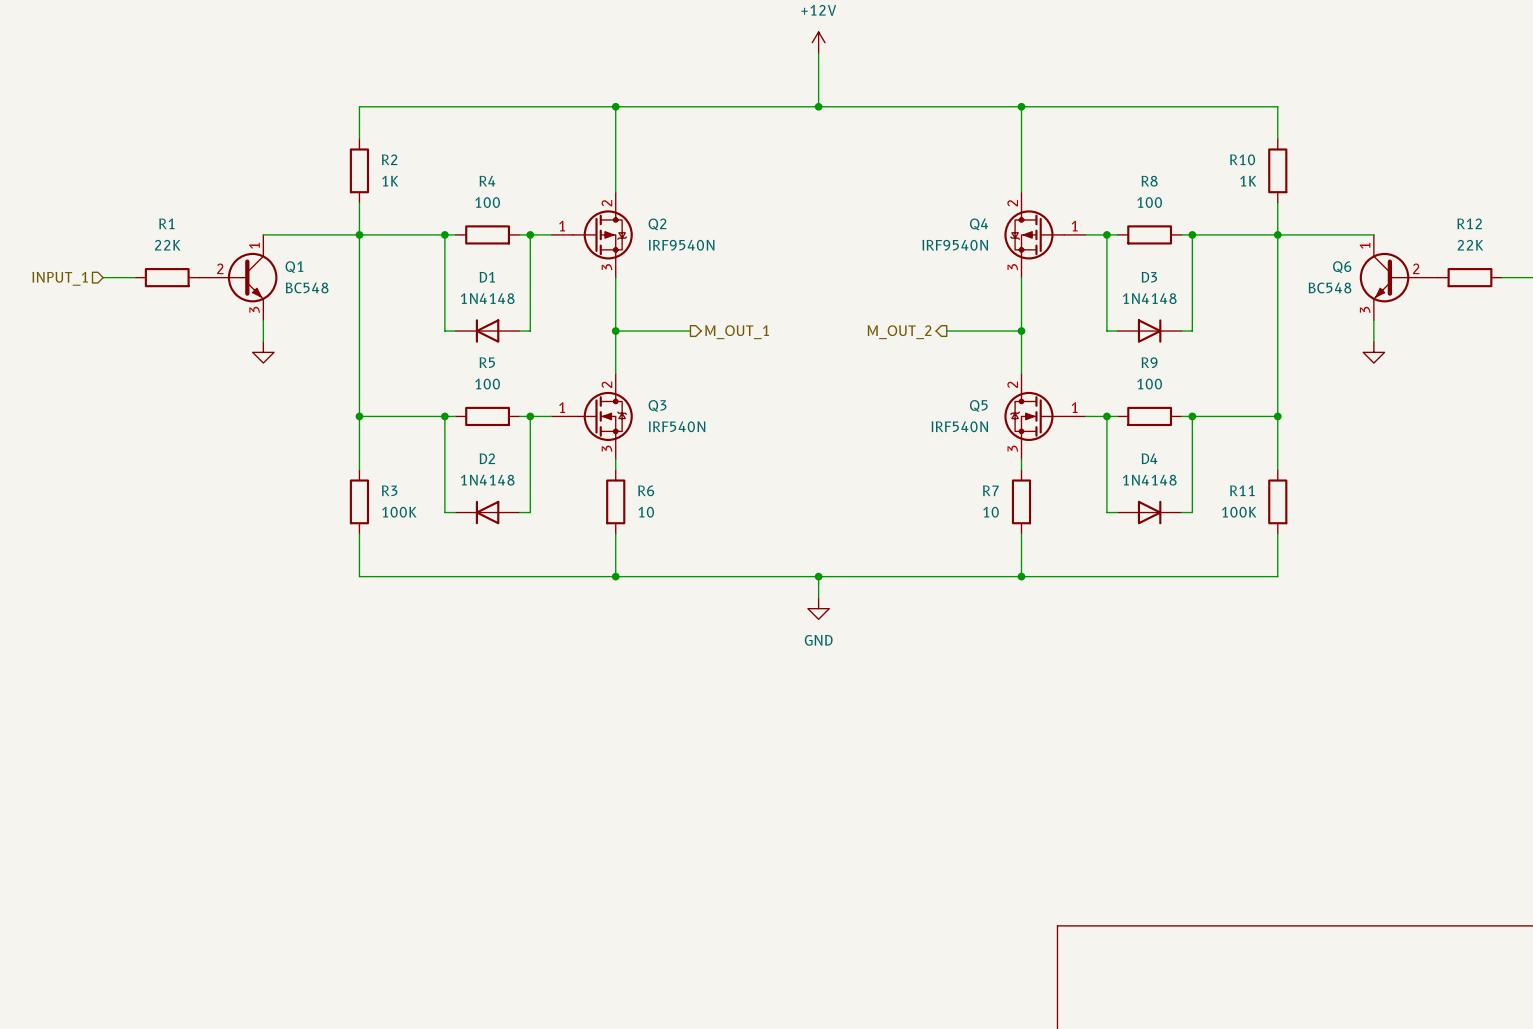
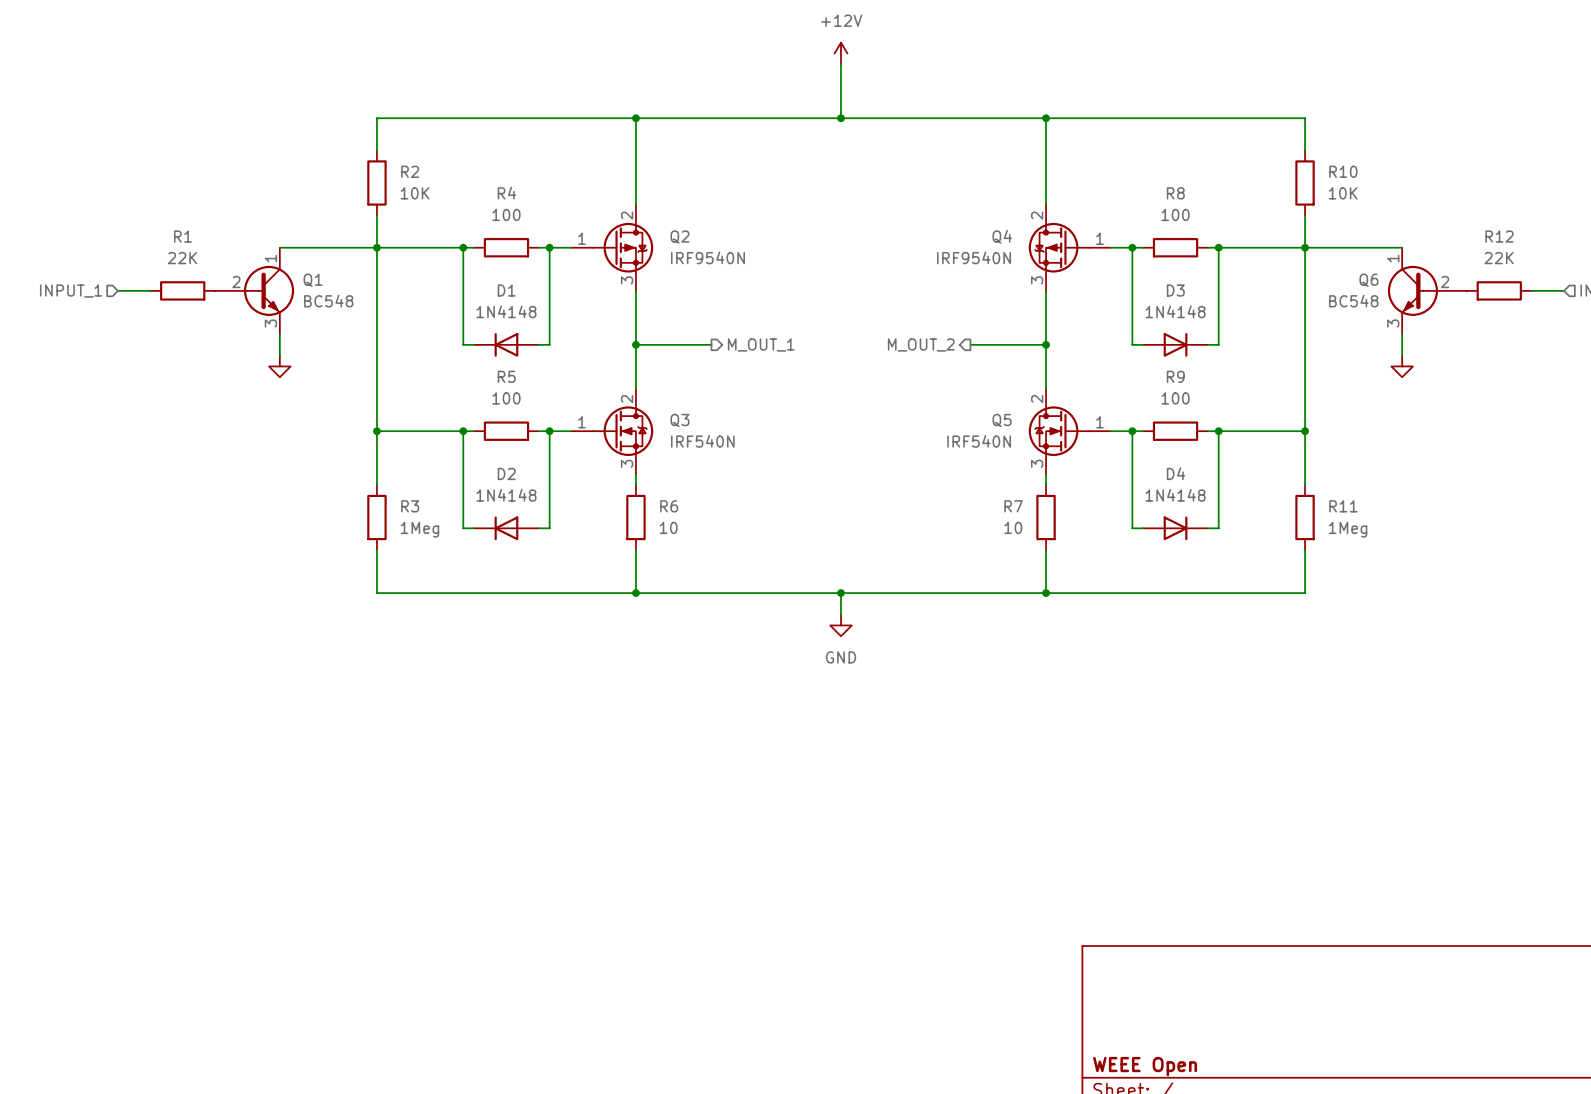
R10 name position: R10 (1242, 159) -> R10 (1343, 171)
R2 value: 1K (390, 181) -> 10K (415, 193)
R10 value: 1K (1248, 181) -> 10K (1343, 193)
R11 name position: R11 (1242, 490) -> R11 (1343, 506)
R3 value: 100K (399, 512) -> 1Meg (419, 529)
R11 value: 100K (1239, 512) -> 1Meg (1348, 529)

